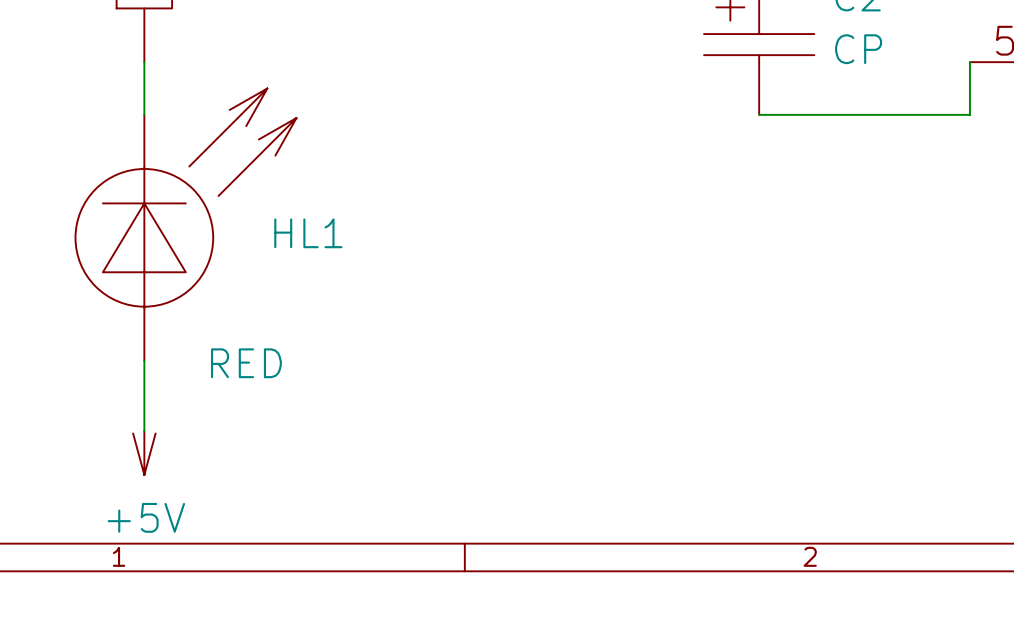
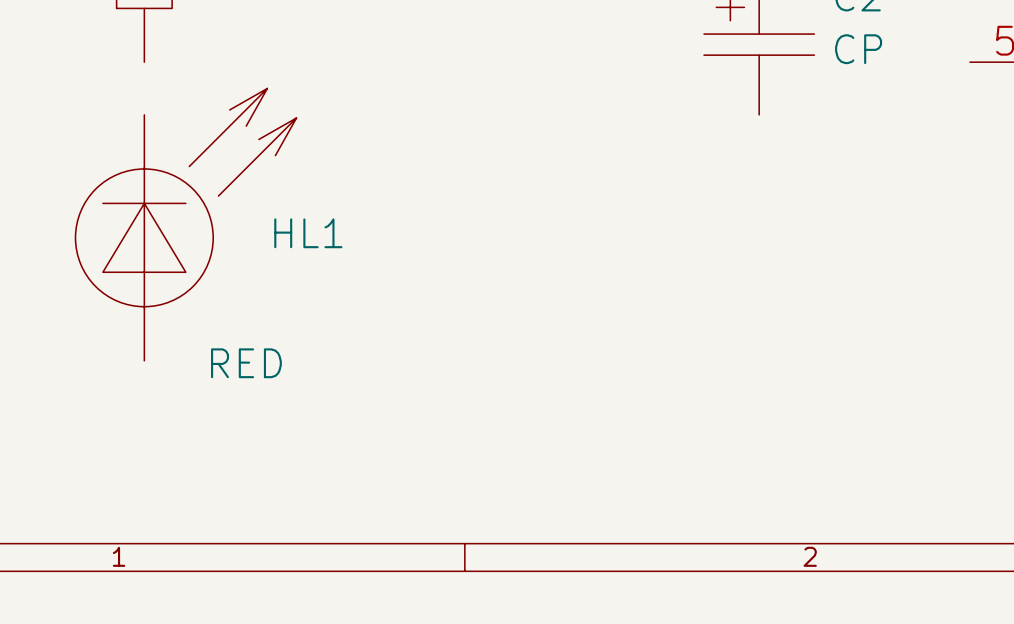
wire: (144, 62) (144, 114) -> none
wire: (969, 62) (969, 114) (759, 114) -> none
wire: (144, 360) (144, 431) -> none
power symbol: +5V (144, 453) -> none

